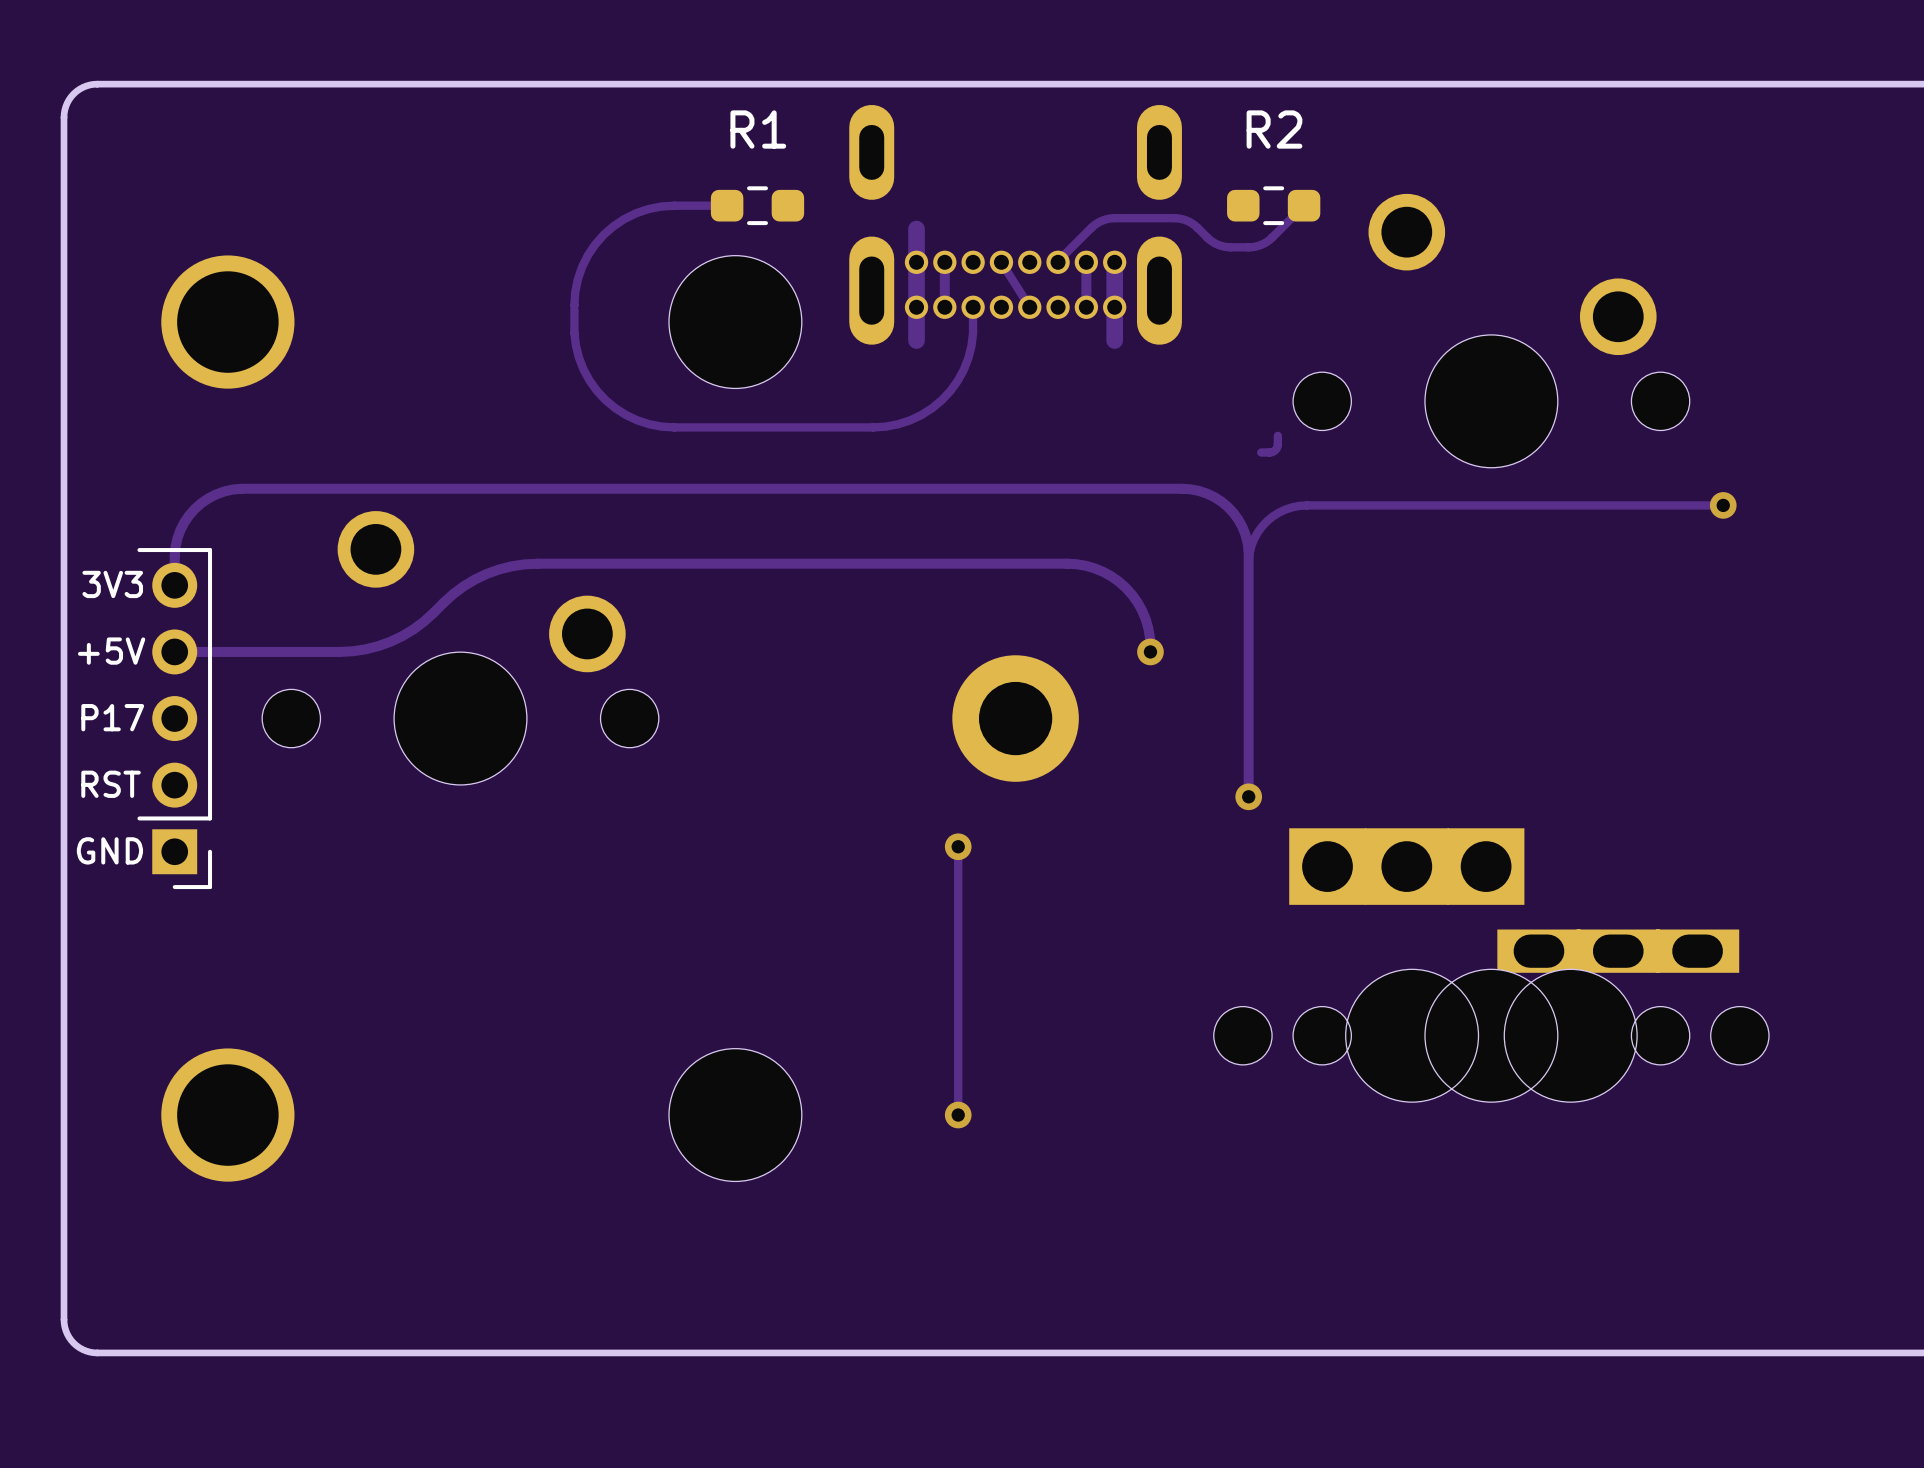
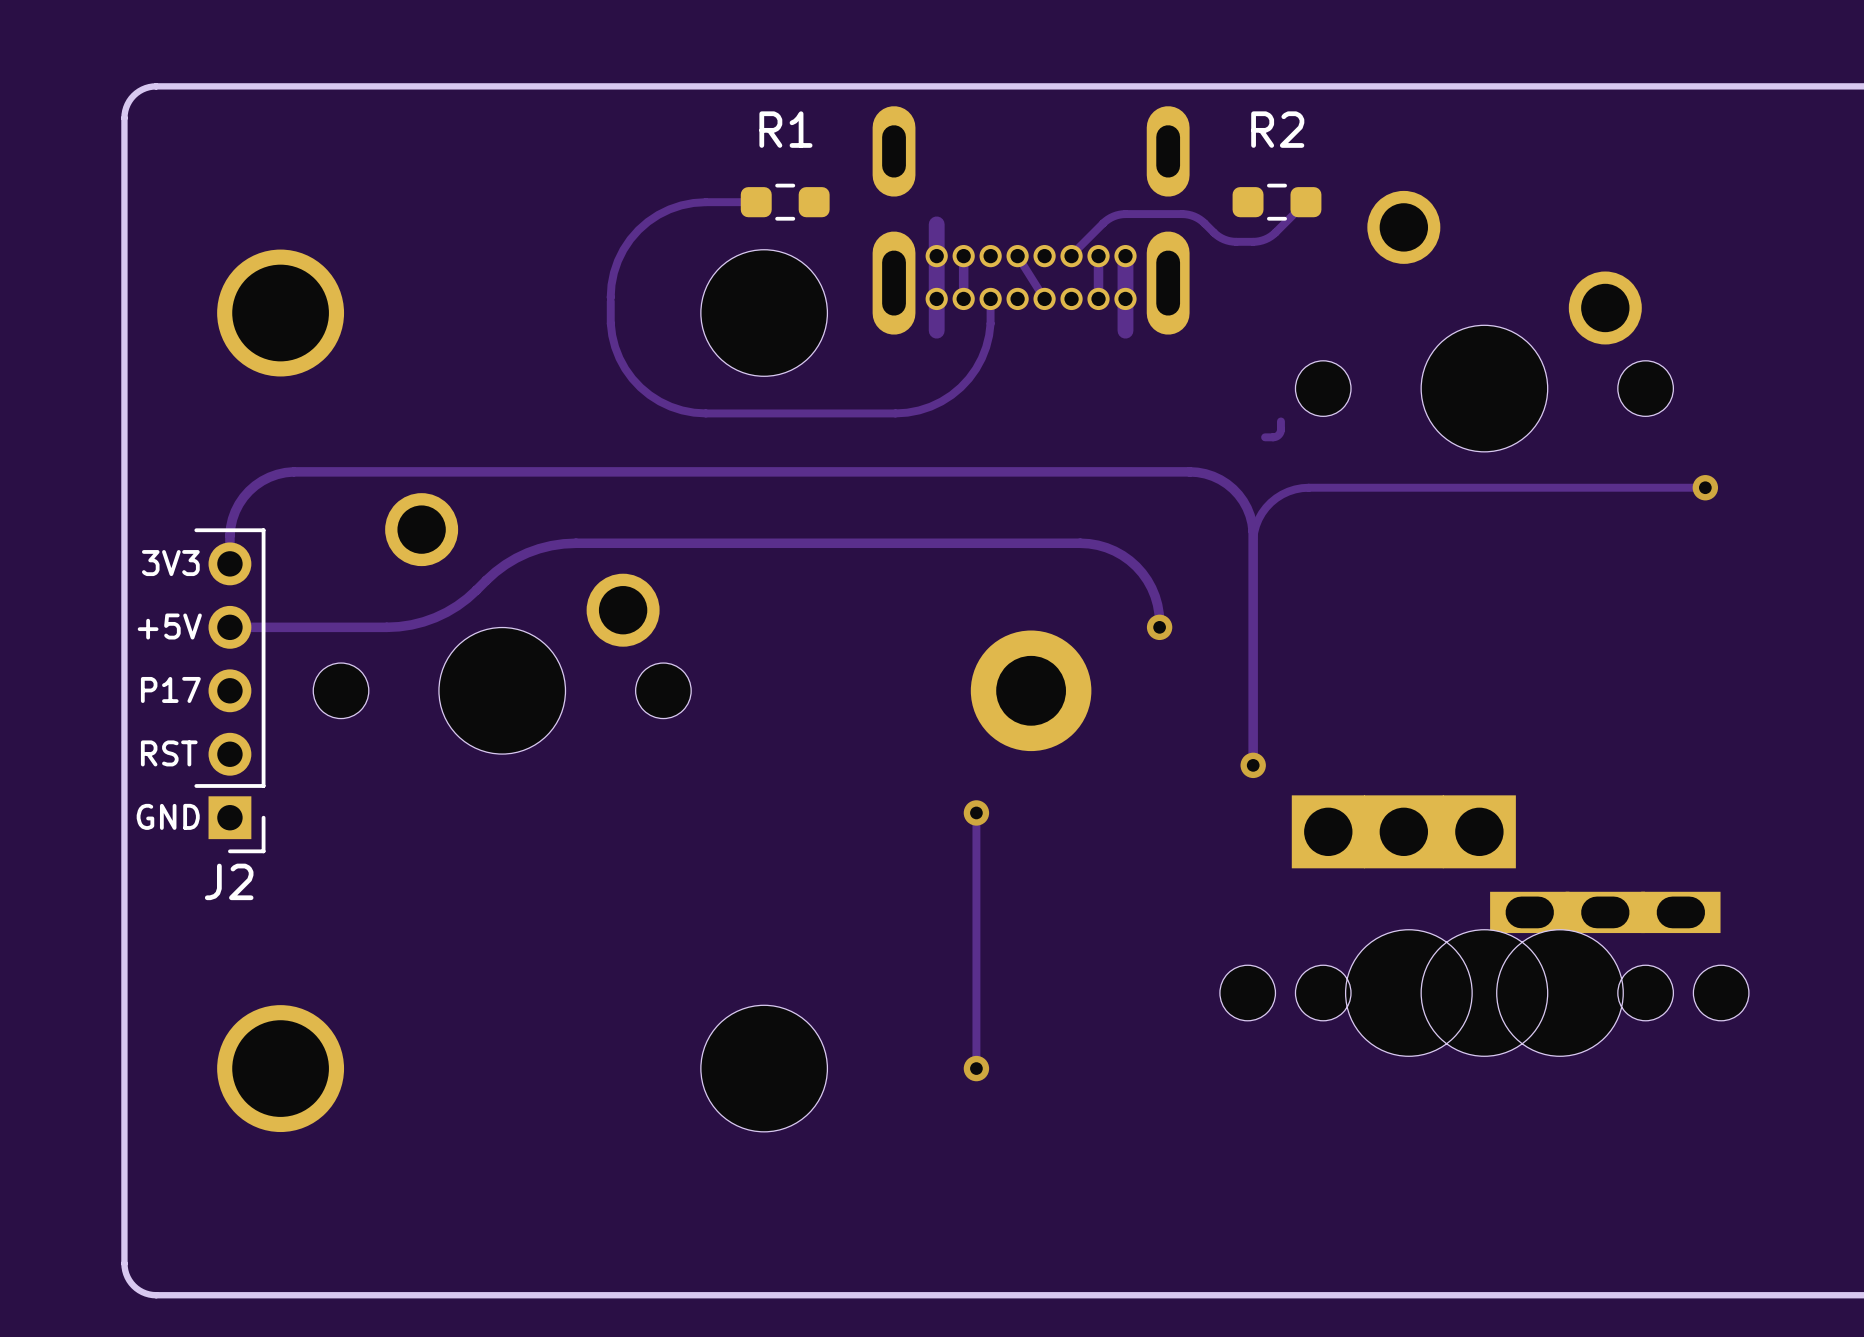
J2 name: none -> J2 (229, 881)

